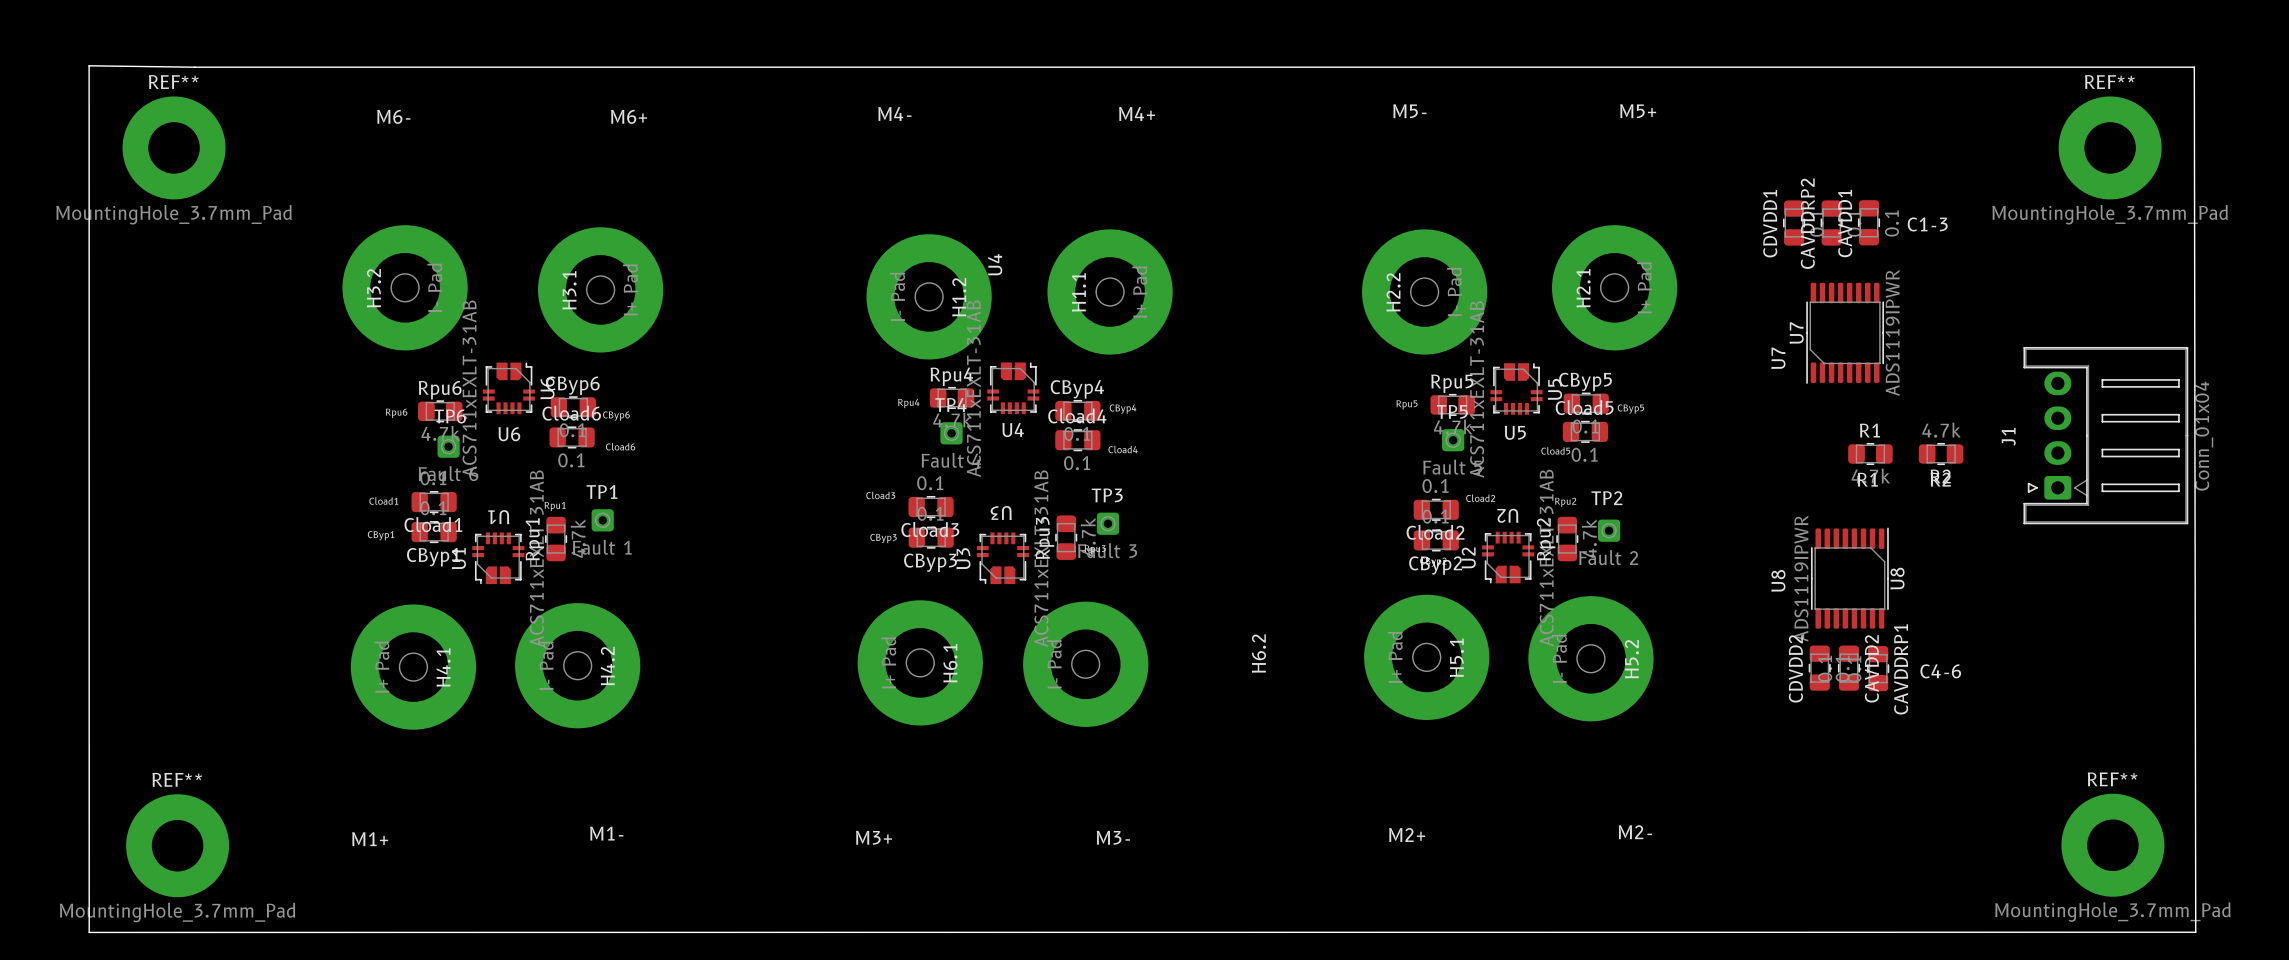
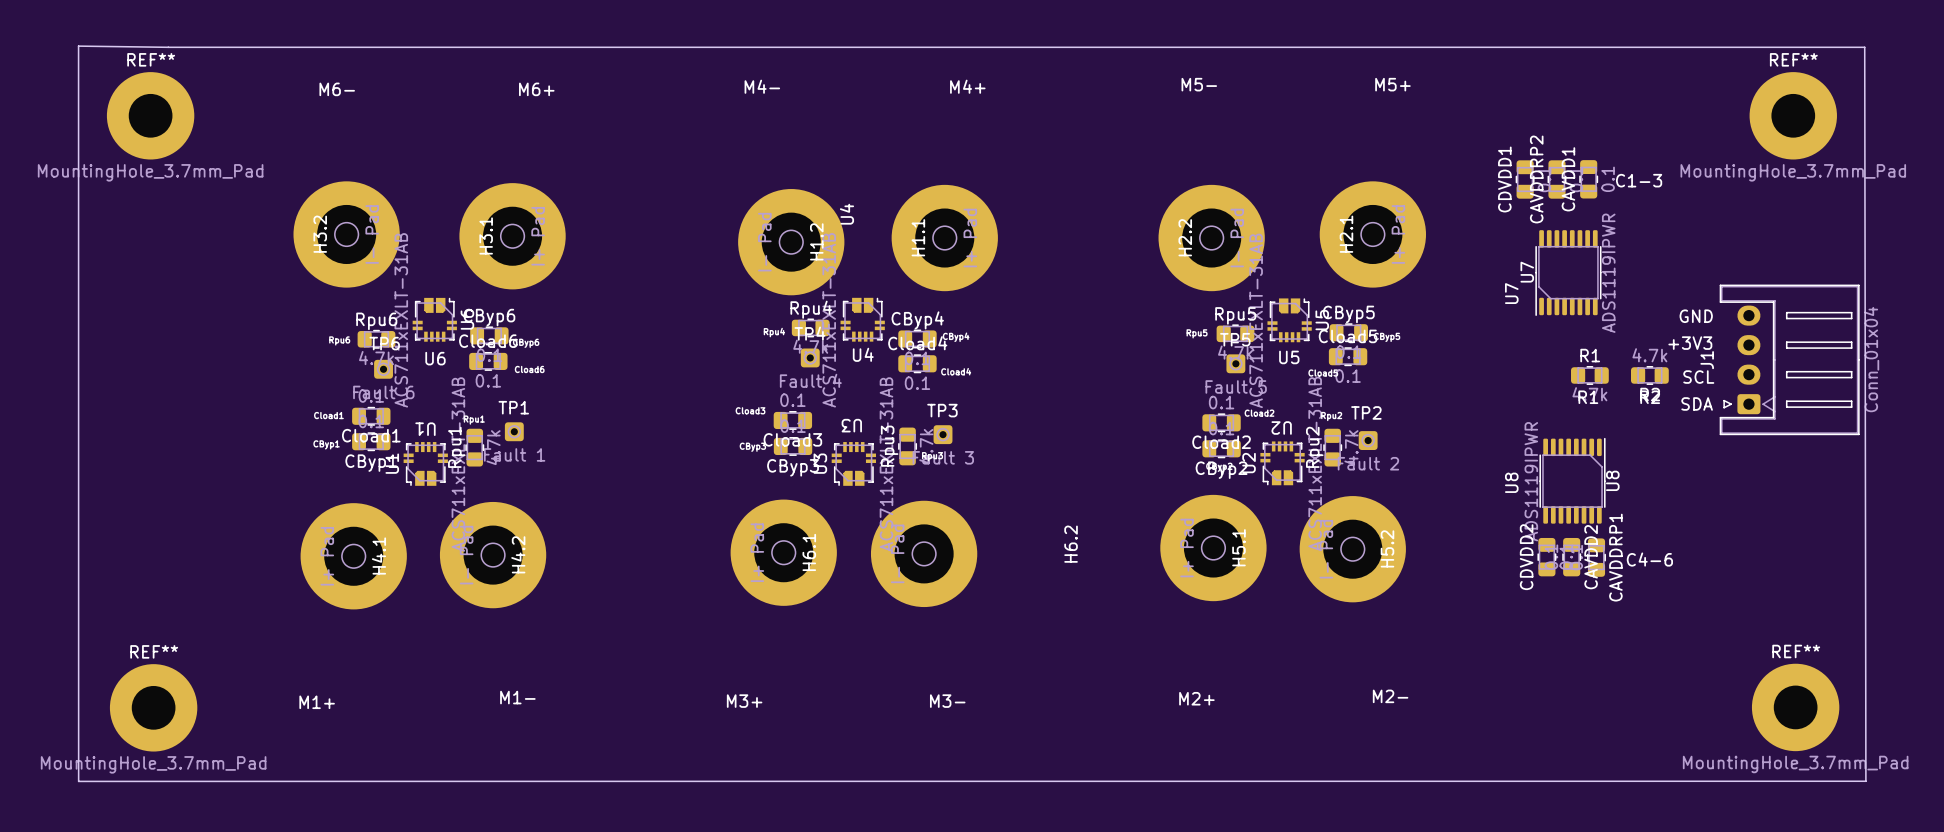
text: none -> GND (1696, 316)
text: none -> +3V3 (1690, 343)
text: none -> SCL (1698, 377)
text: none -> SDA (1697, 403)

